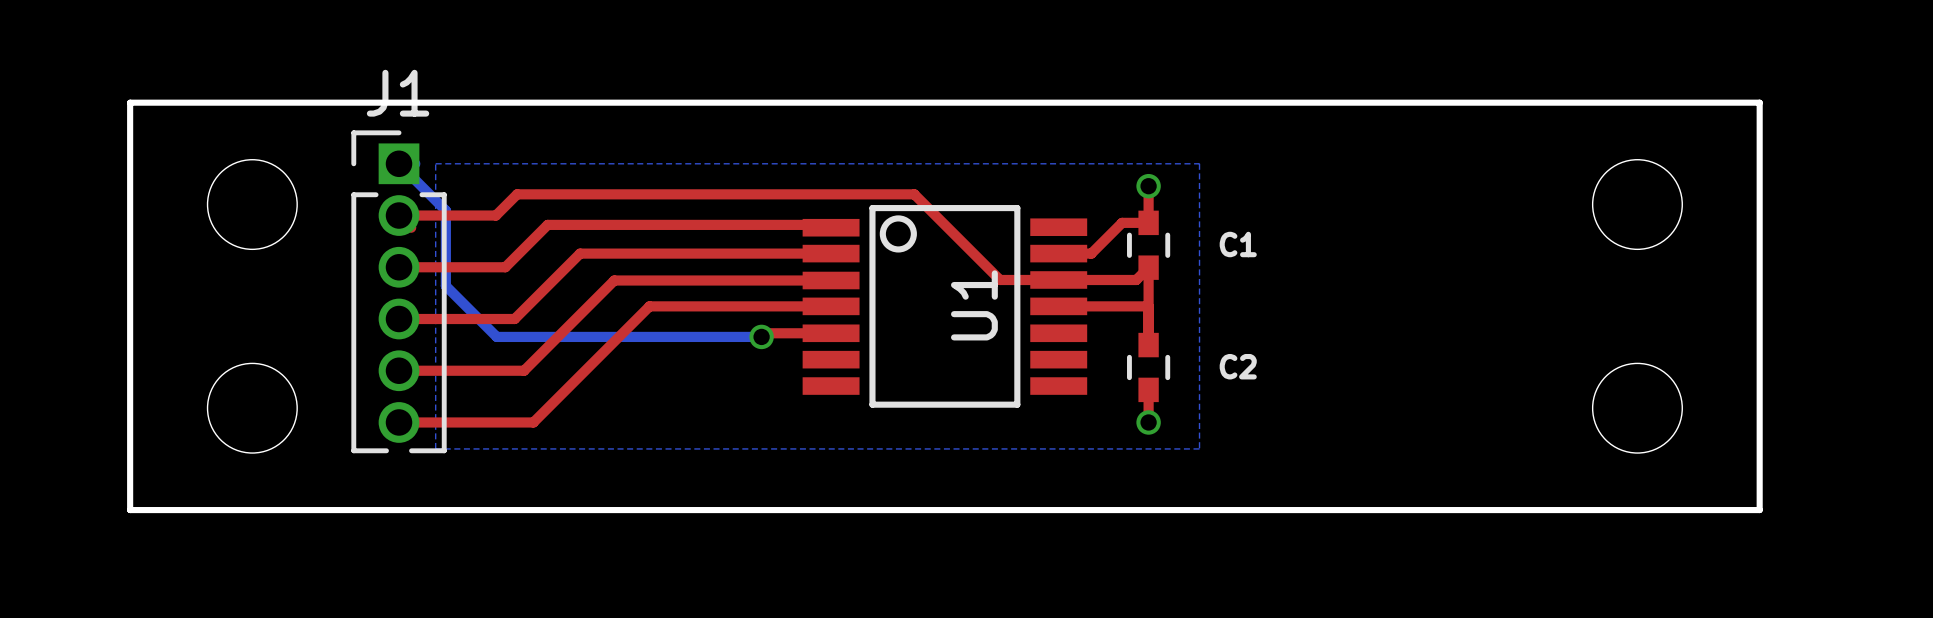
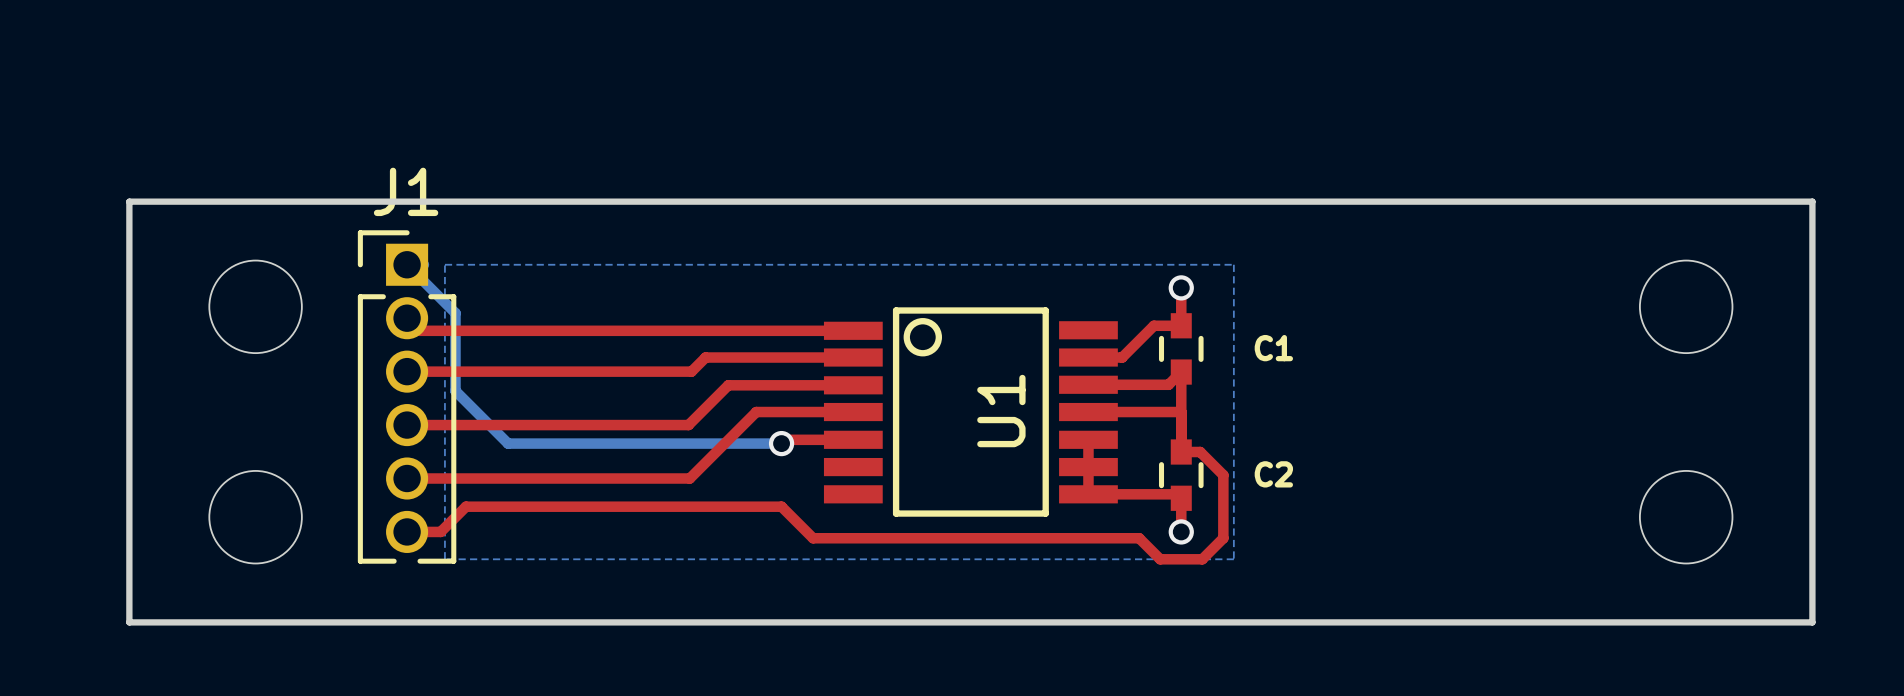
top track: (399, 215) (495, 215) (517, 194) (914, 194) (1000, 279) (1058, 279) -> none
top track: (831, 227) (828, 224) (547, 224) (505, 267) -> (853, 330) (419, 330)
top track: (688, 253) (580, 253) (514, 319) -> (728, 385) (688, 425) (526, 425)
top track: none -> (705, 357) (691, 371) (516, 371)
top track: (710, 280) (614, 280) (524, 370) -> (756, 412) (689, 478) (536, 478)
top track: (737, 306) (649, 306) (533, 422) (431, 422) -> (1181, 452) (1200, 452) (1223, 475) (1223, 538) (1202, 559) (1160, 559) (1139, 538) (813, 538) (781, 506) (465, 506) (440, 531)
top track: none -> (1088, 439) (1088, 494) (1177, 494)

